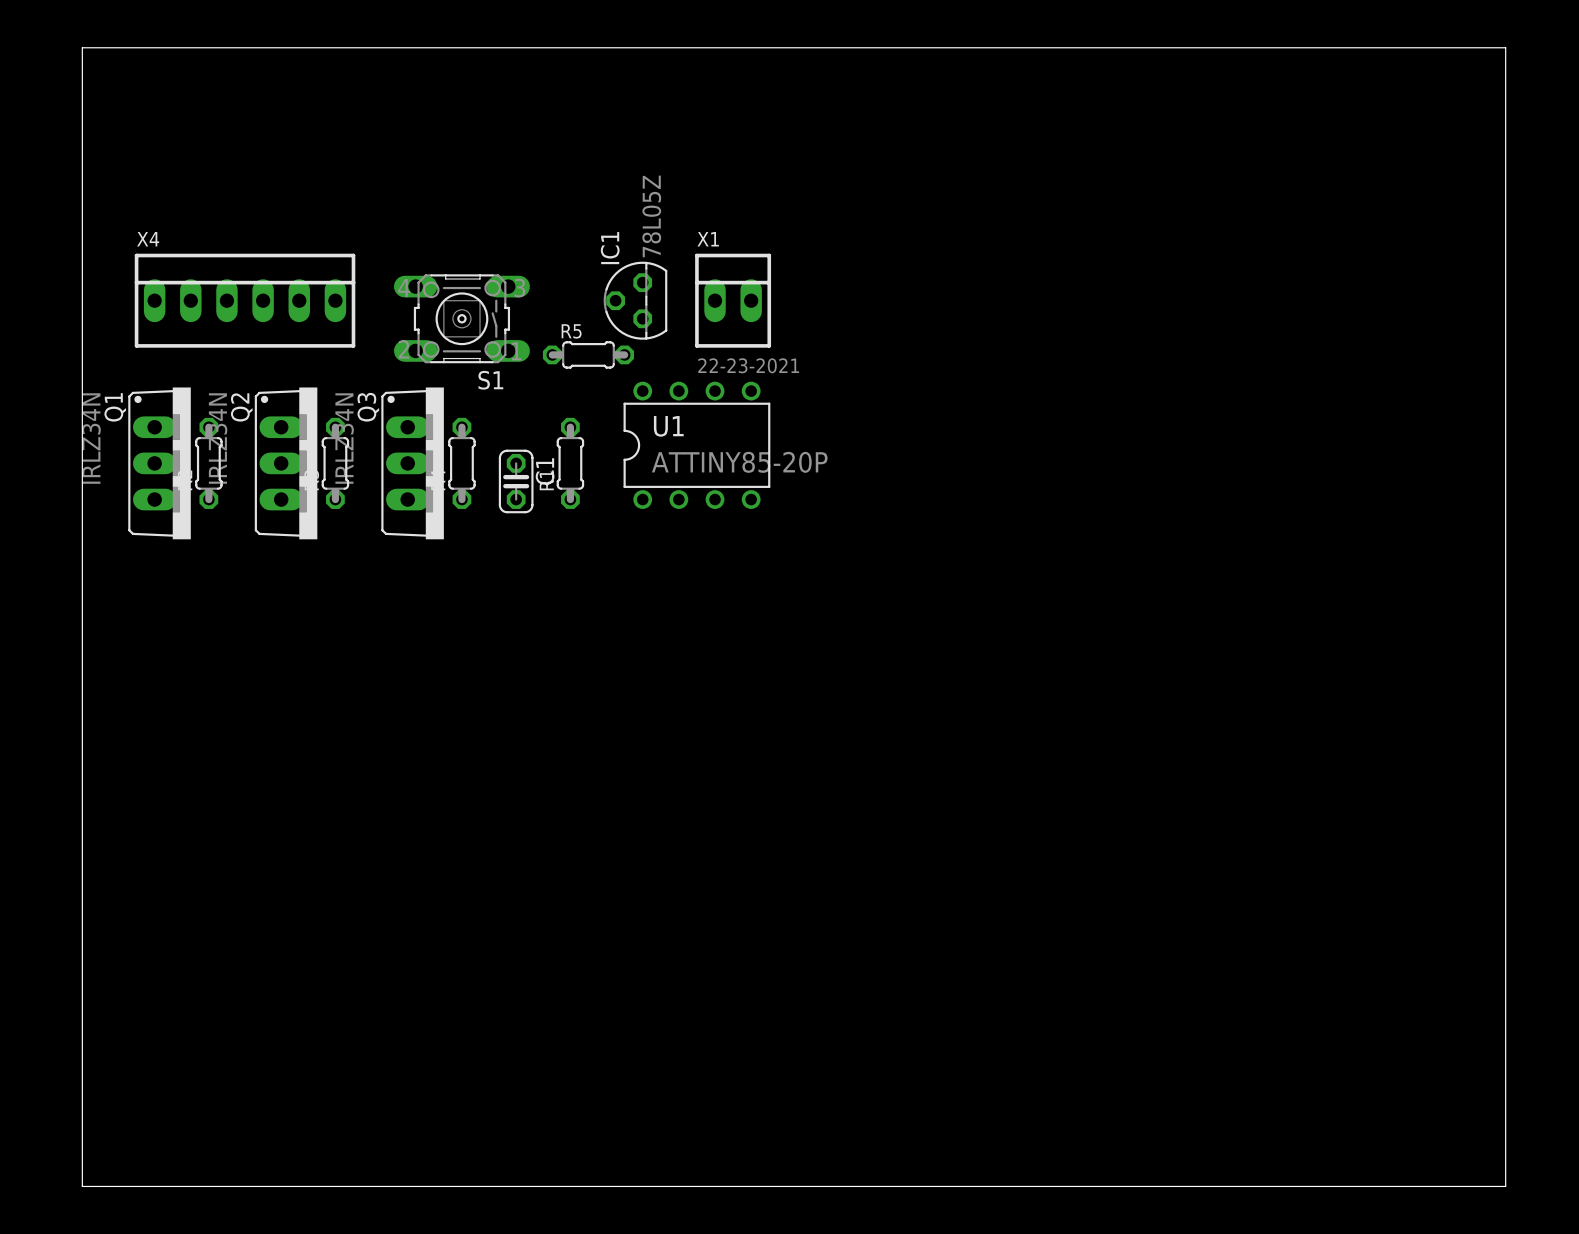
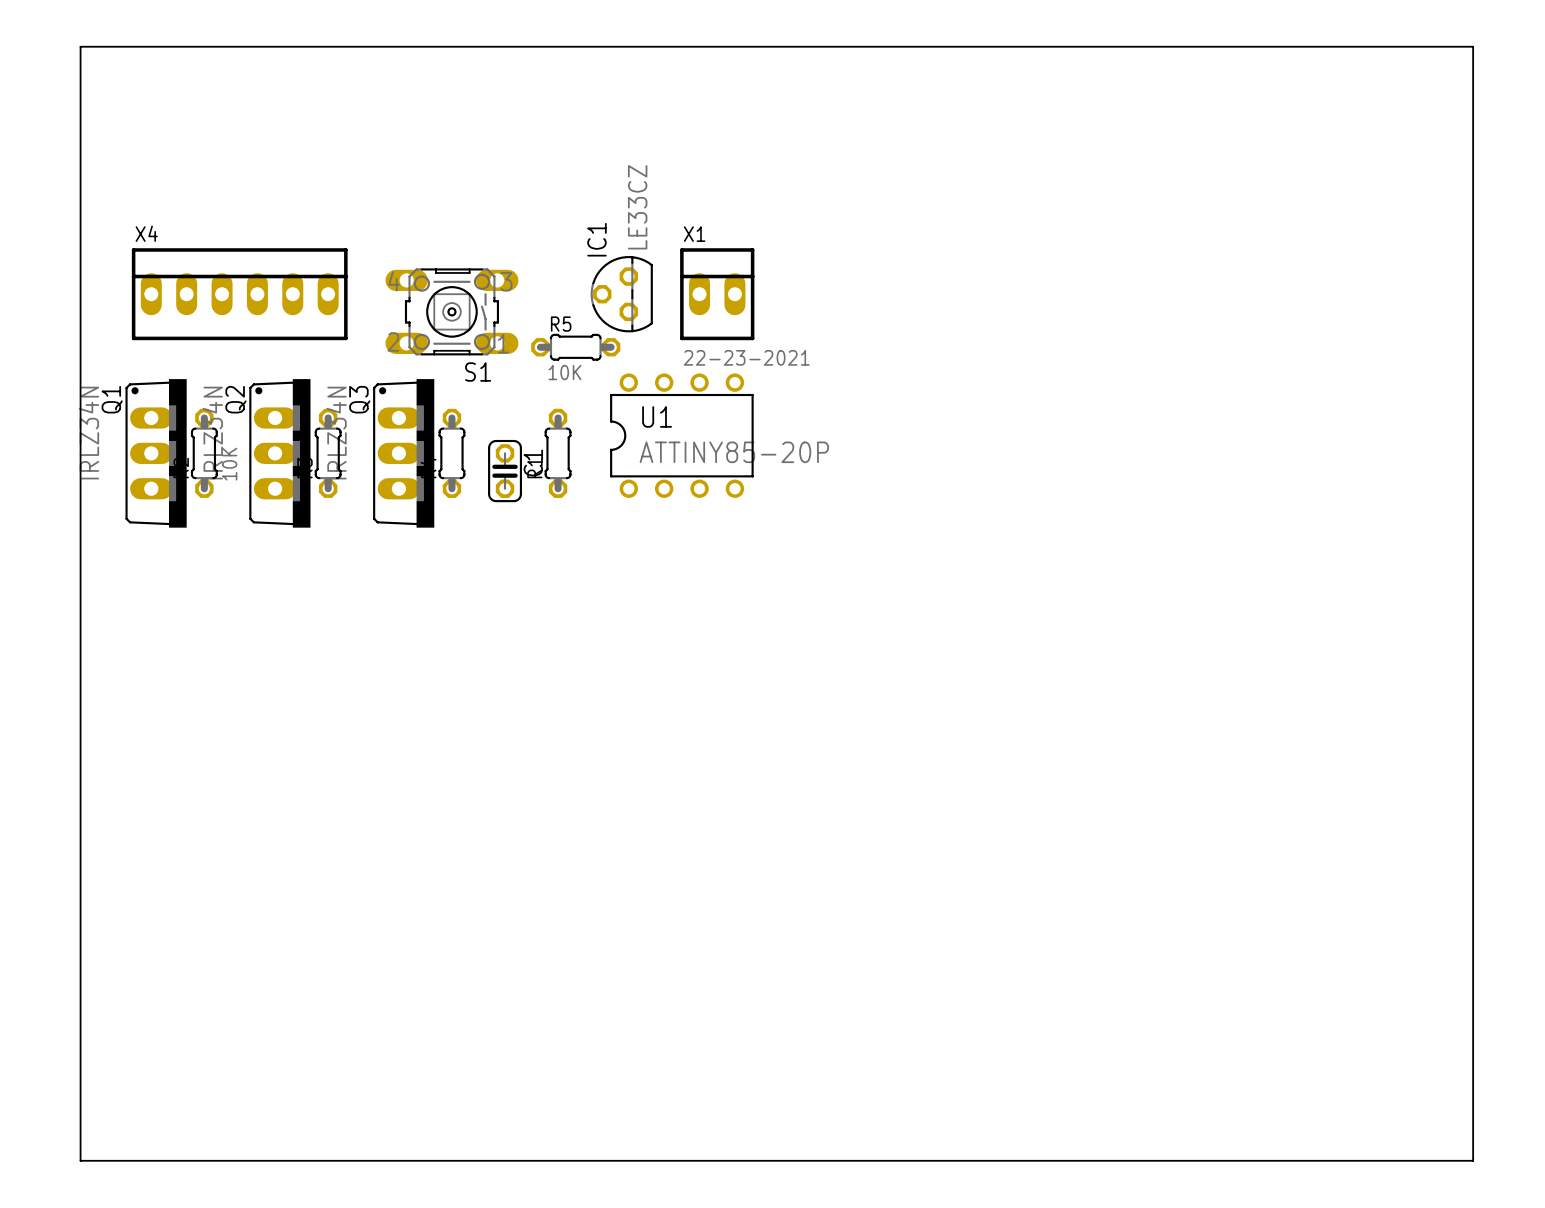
IC1 value: 78L05Z (651, 216) -> LE33CZ (637, 207)
R5 value: none -> 10K (564, 372)
part value: none -> 10K (229, 464)

